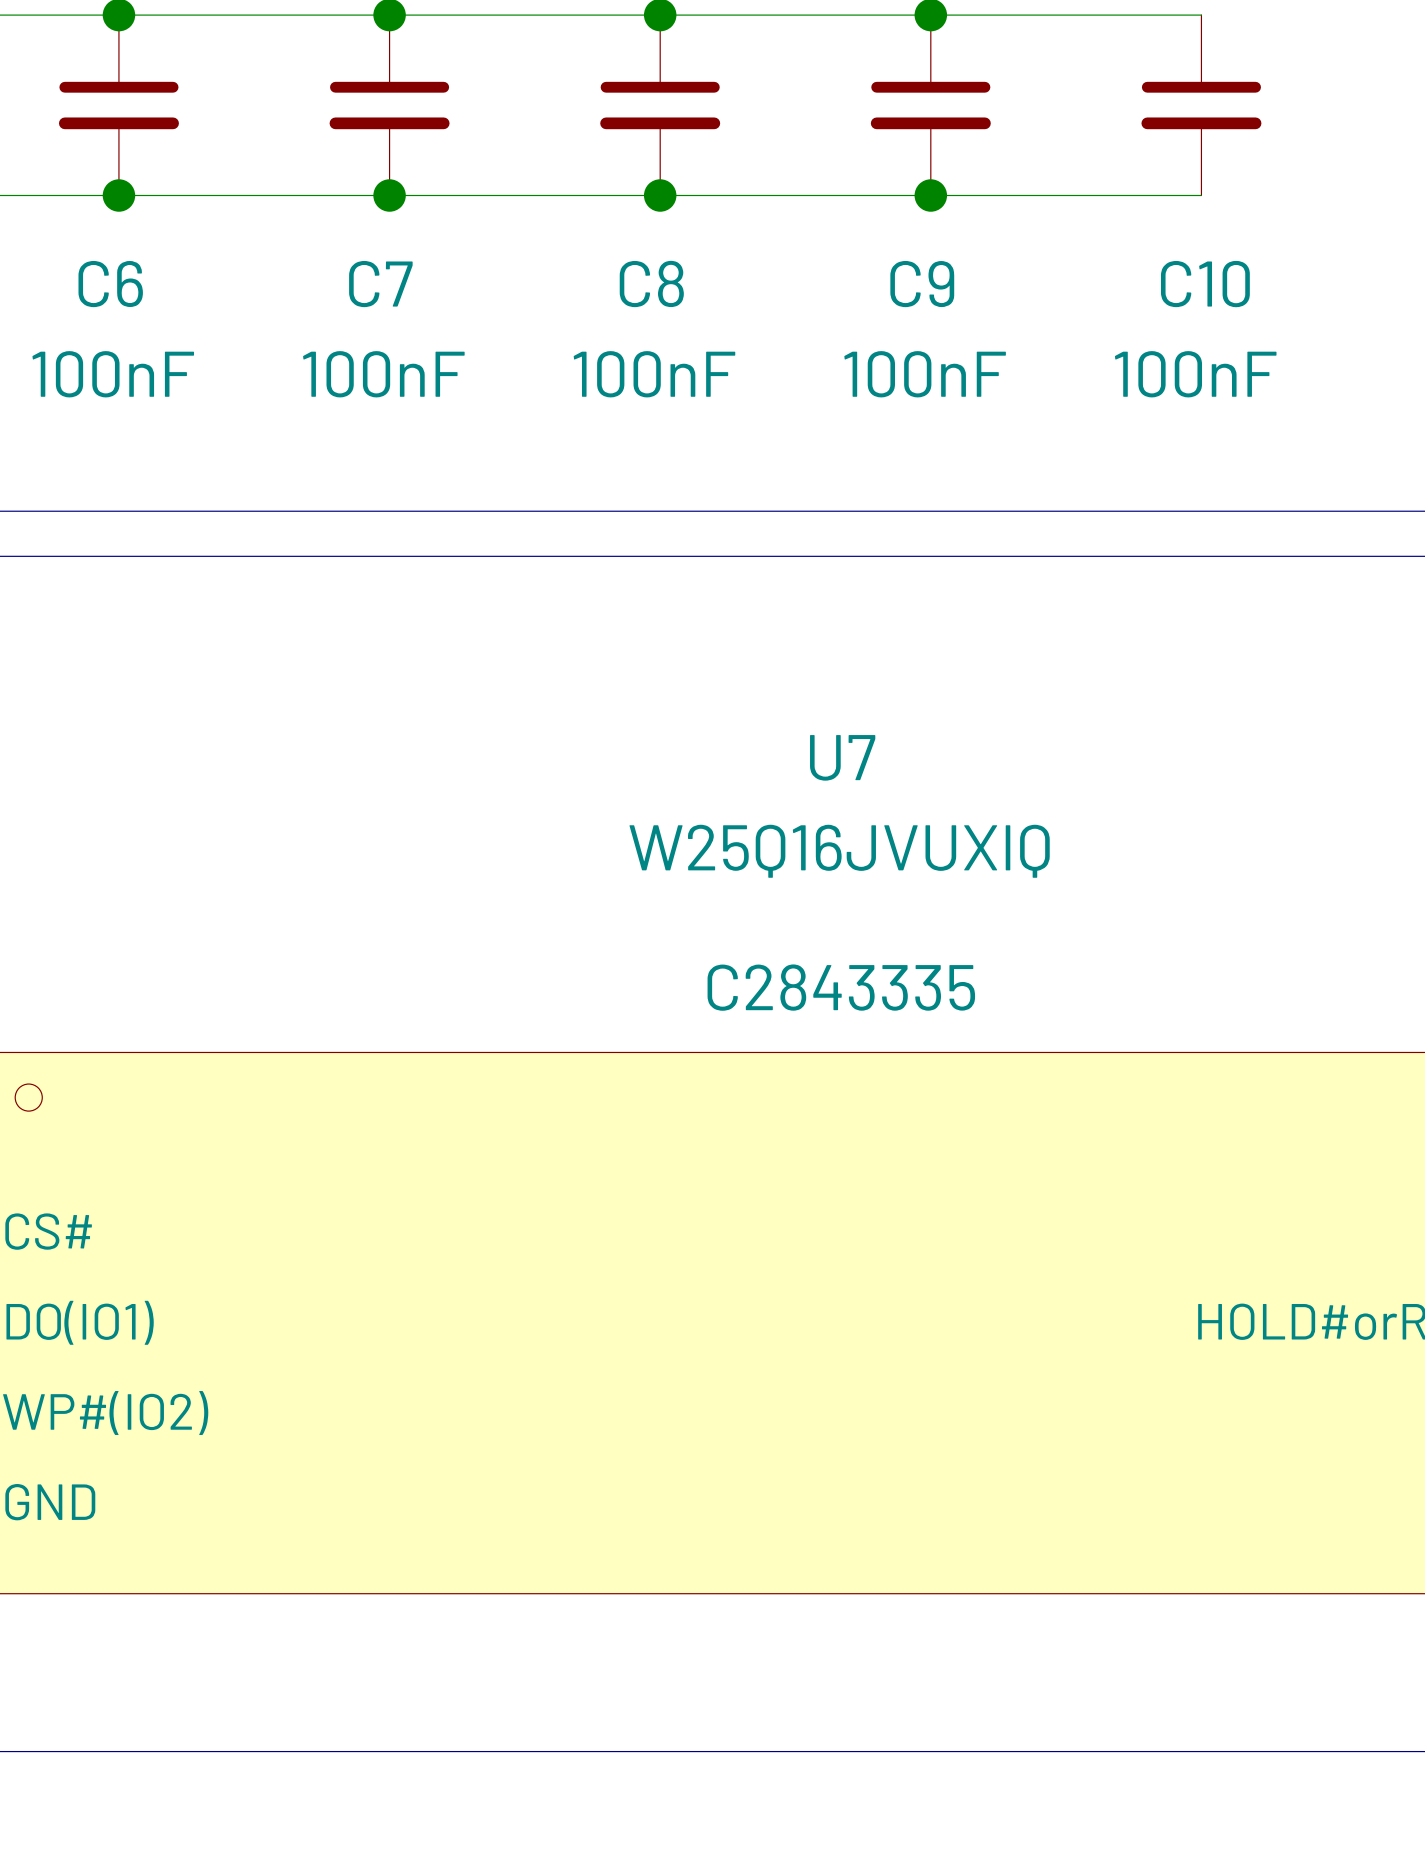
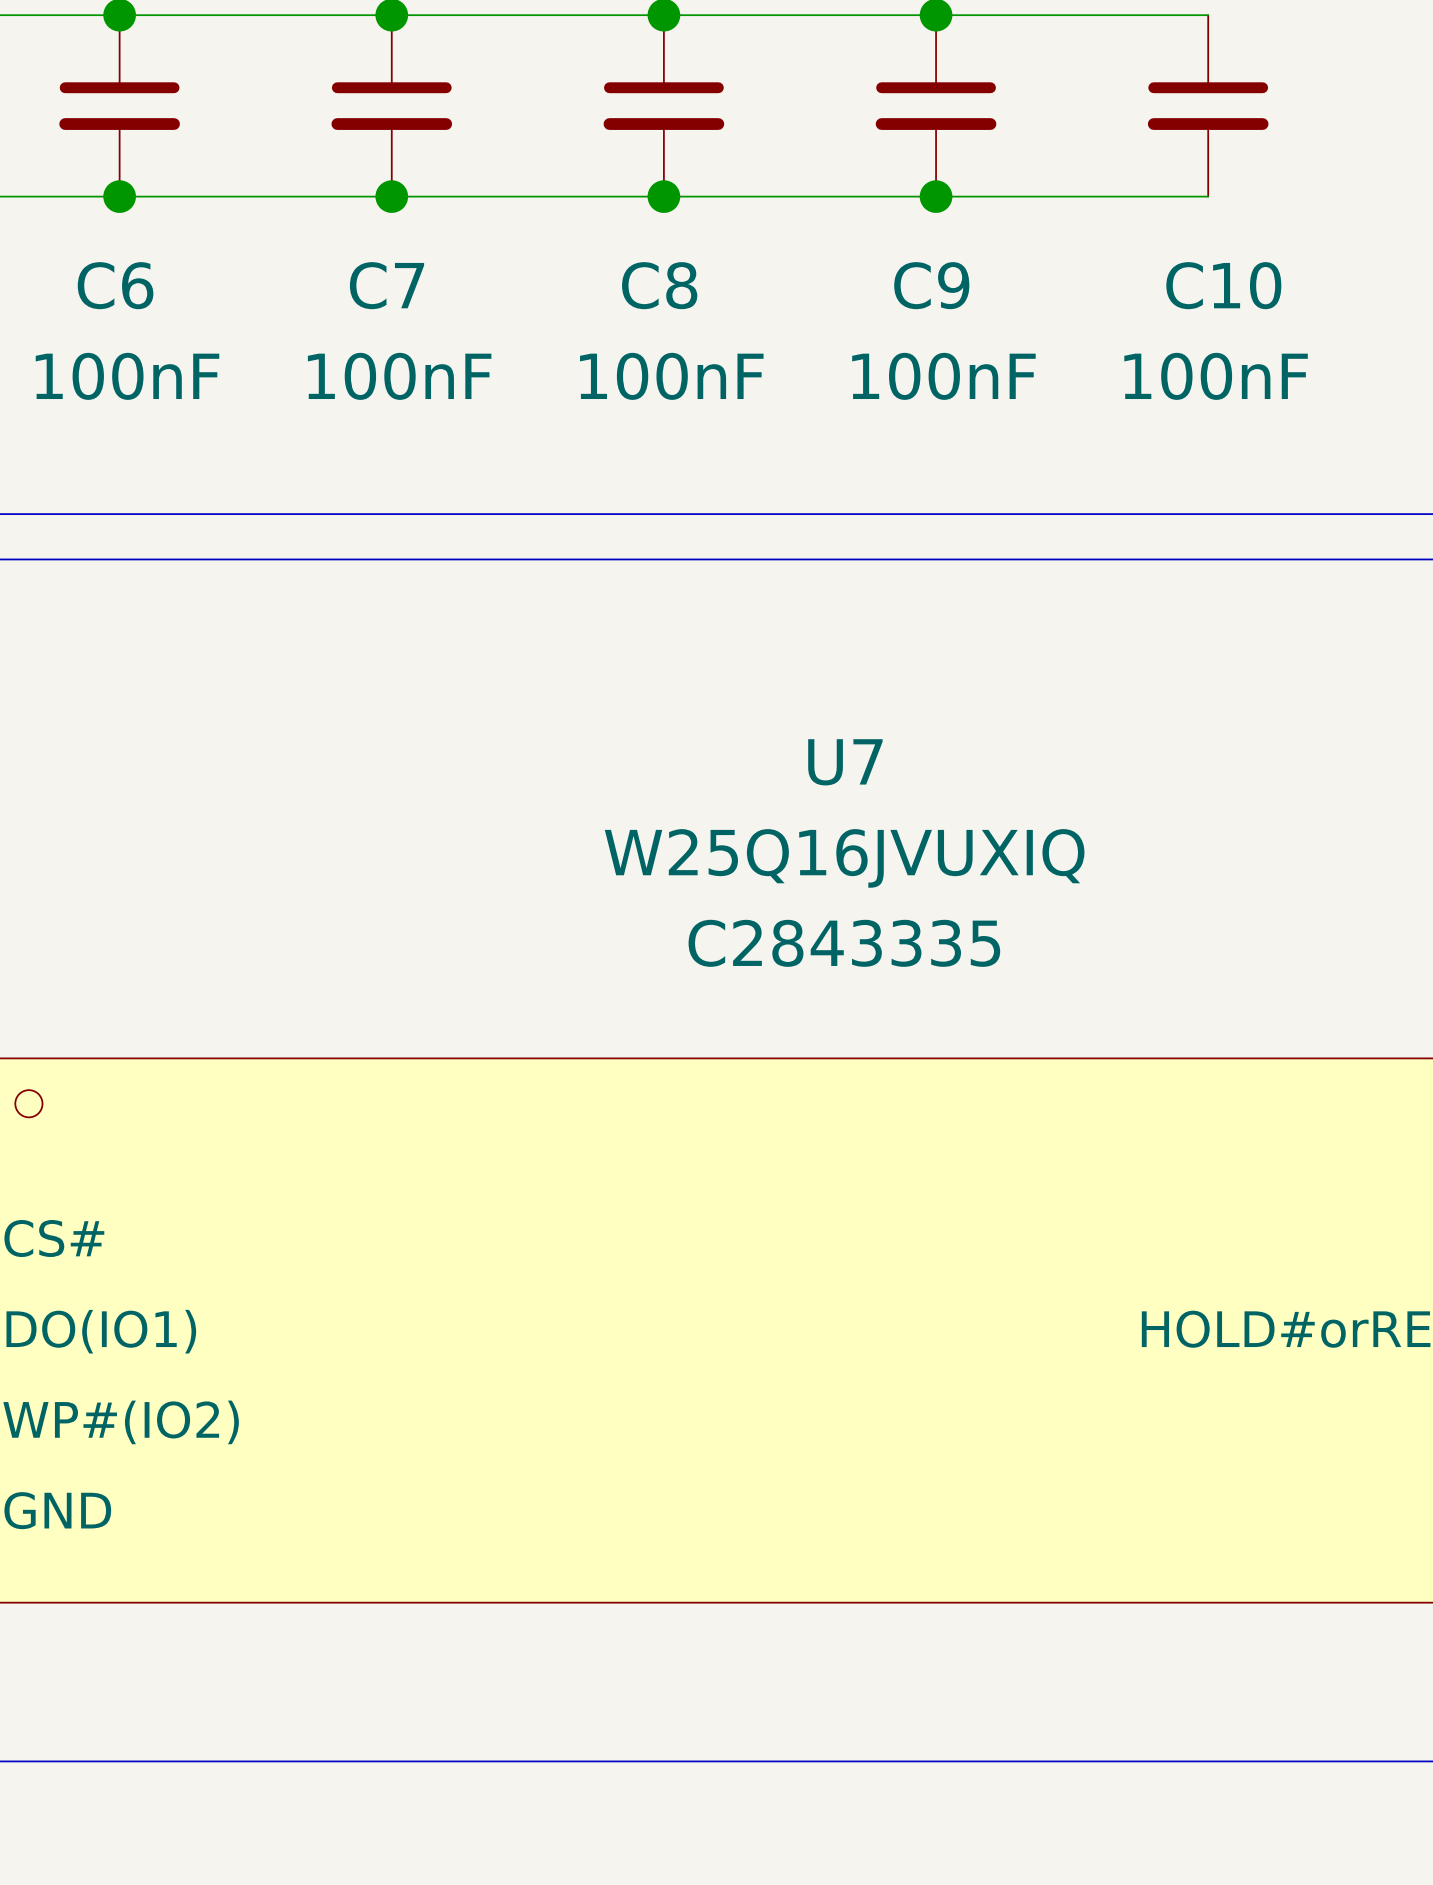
U7 text position: C2843335 (841, 987) -> C2843335 (844, 943)

